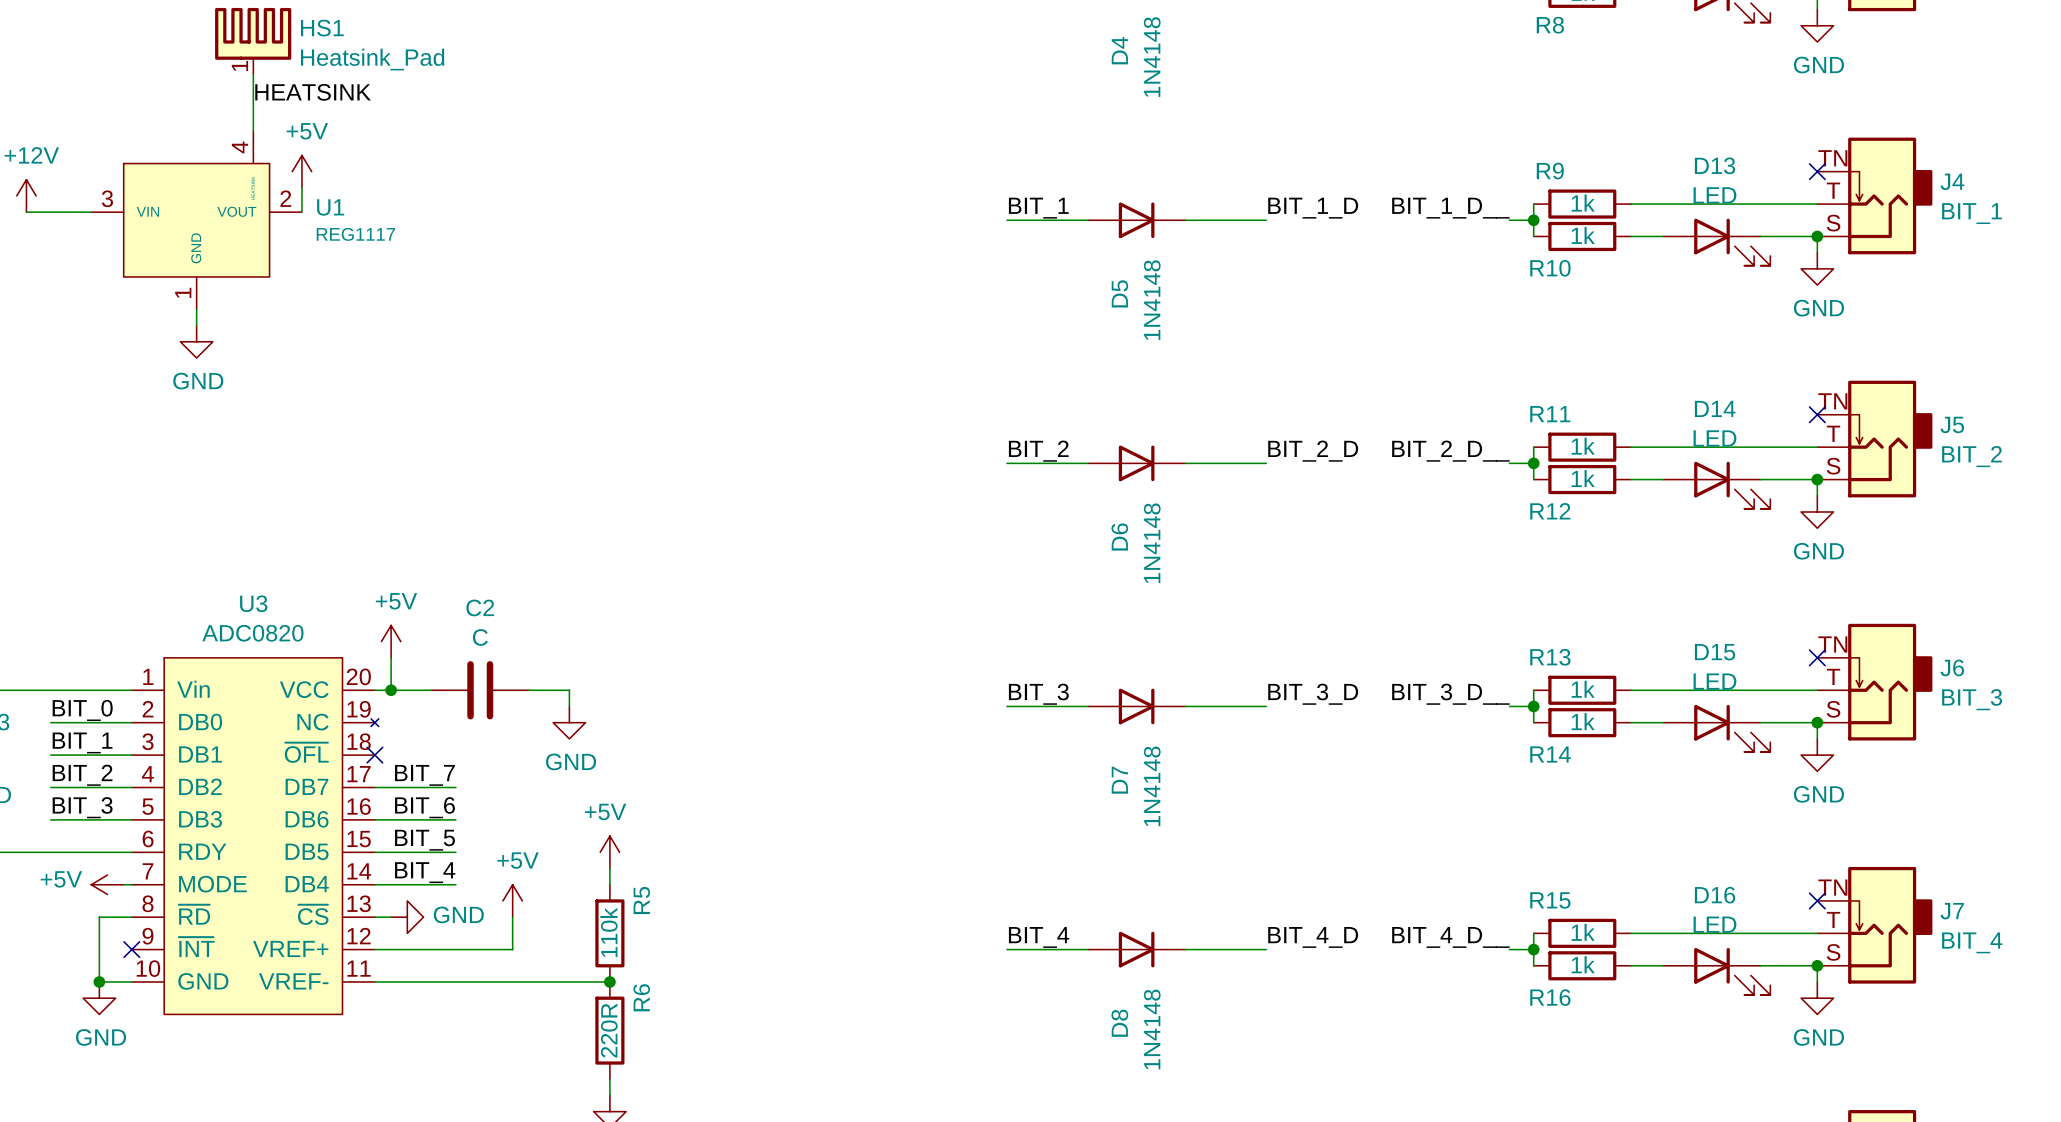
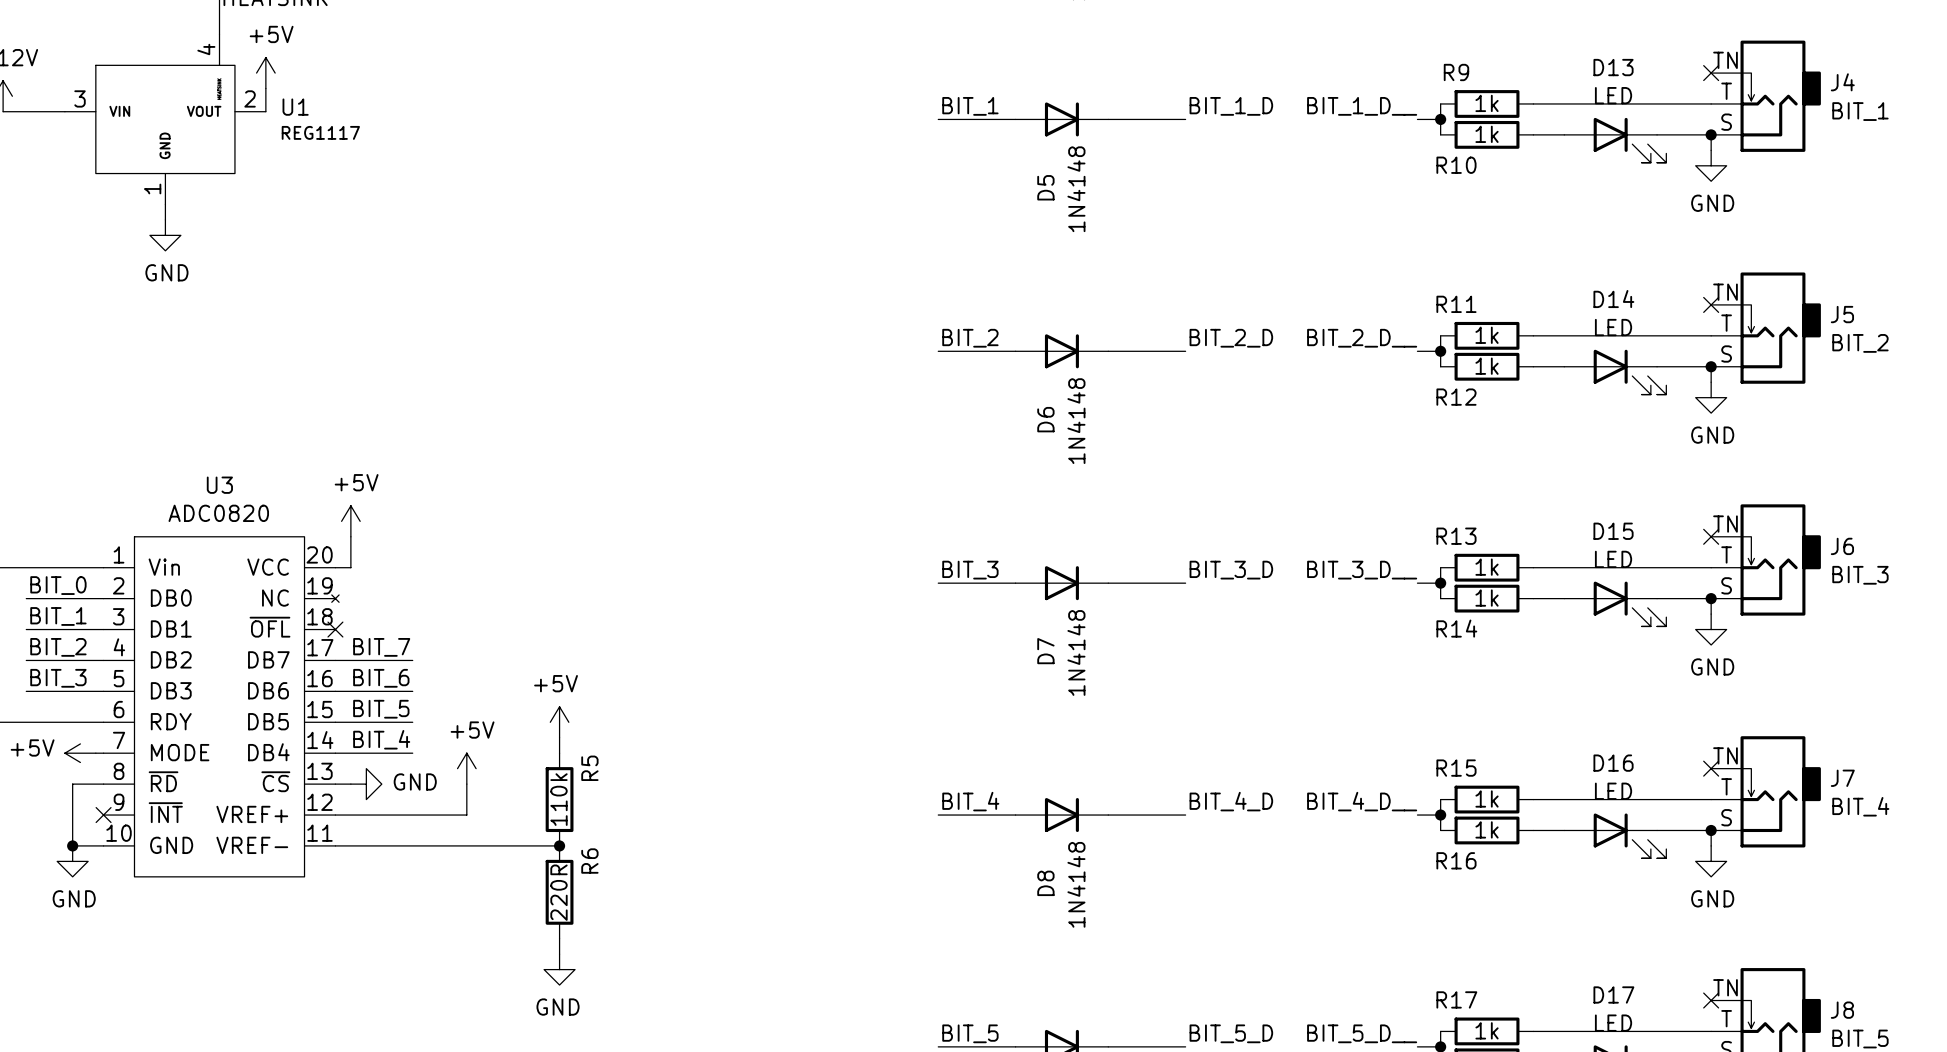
wire: (391, 690) (431, 690) -> none
junction: (391, 690) -> none
C2: C (480, 690) -> none
wire: (528, 690) (569, 690) (569, 706) -> none
power symbol: GND (569, 722) -> none

